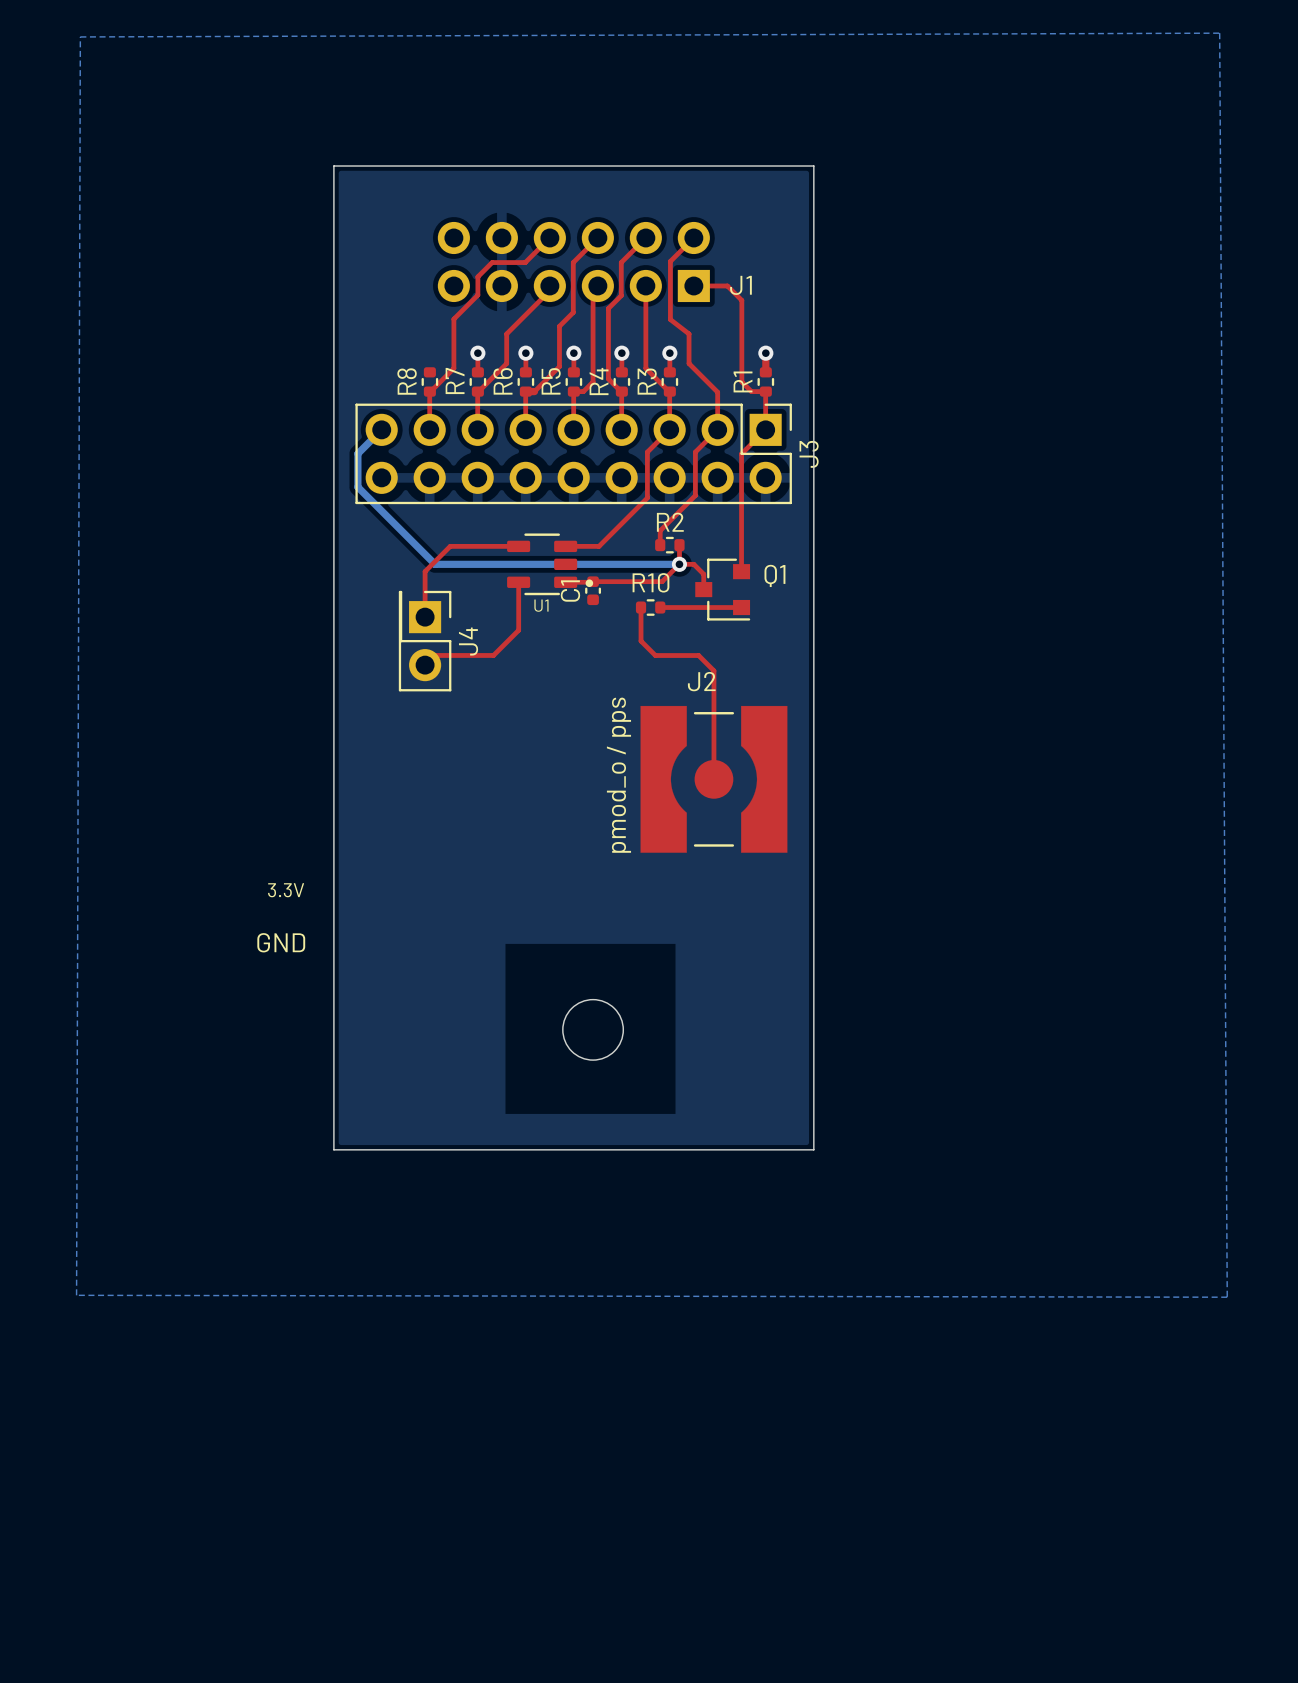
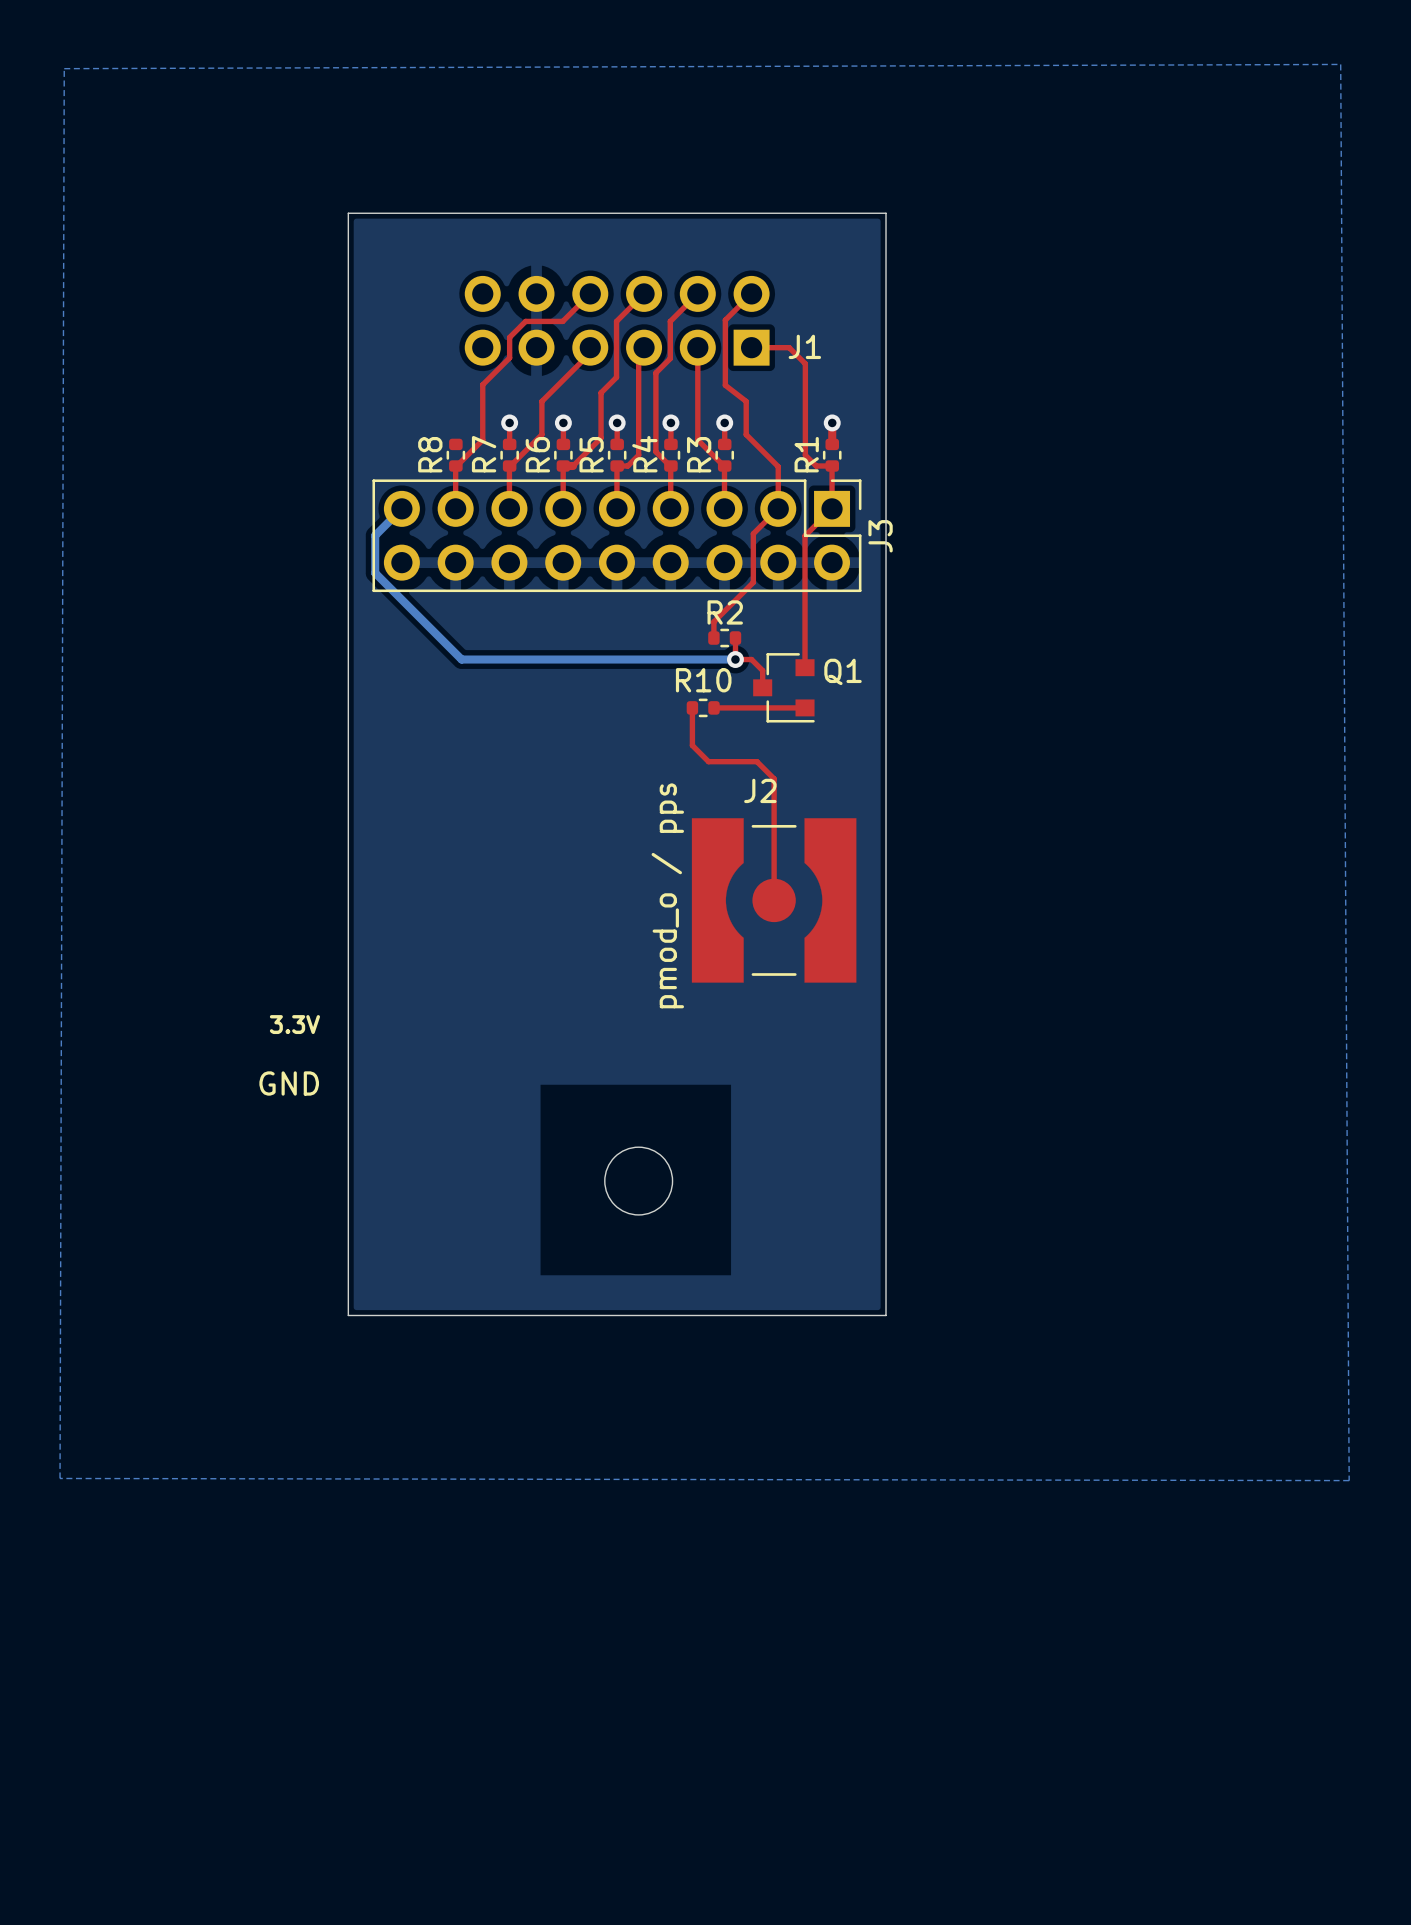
top track: (669, 429) (647, 452) (647, 497) (599, 546) (565, 546) -> none
top track: (518, 546) (450, 546) (425, 571) (425, 617) (413, 605) -> none
U1: (550, 564) -> none
top track: (679, 564) (662, 581) (565, 582) -> none
top track: (518, 584) (518, 630) (493, 655) (434, 655) (425, 665) -> none
C1: (593, 590) -> none
J4: (425, 641) -> none

